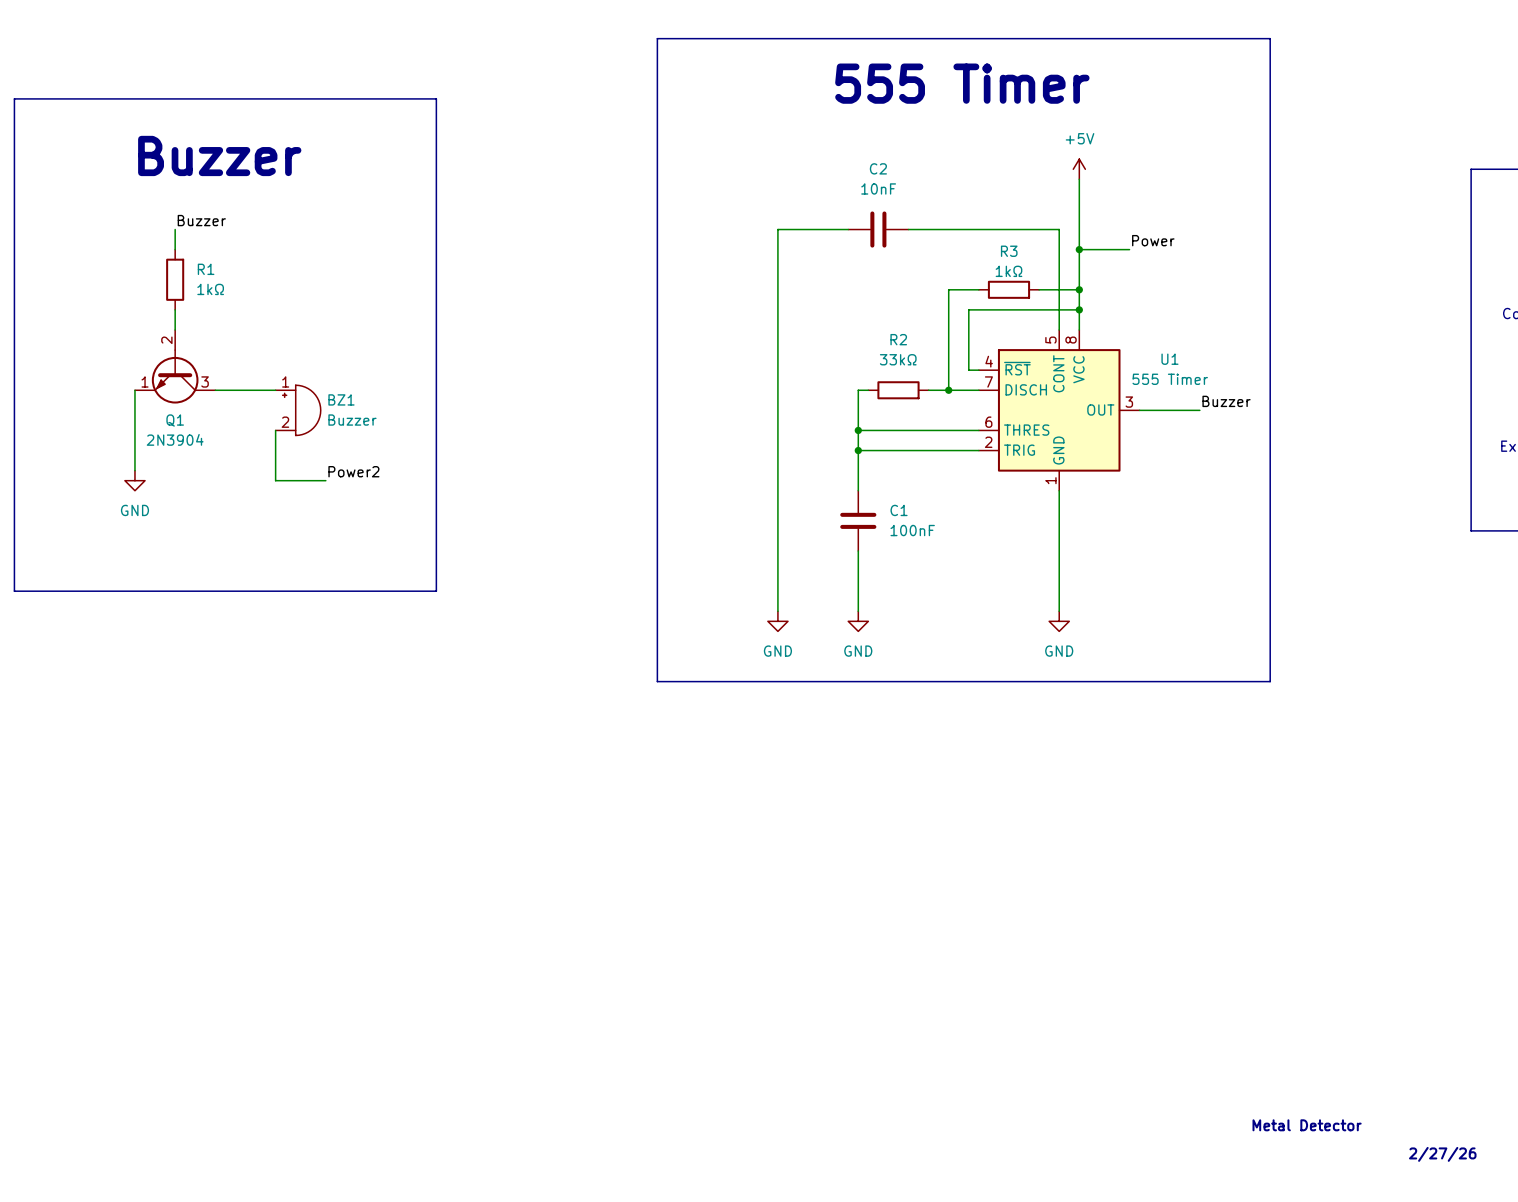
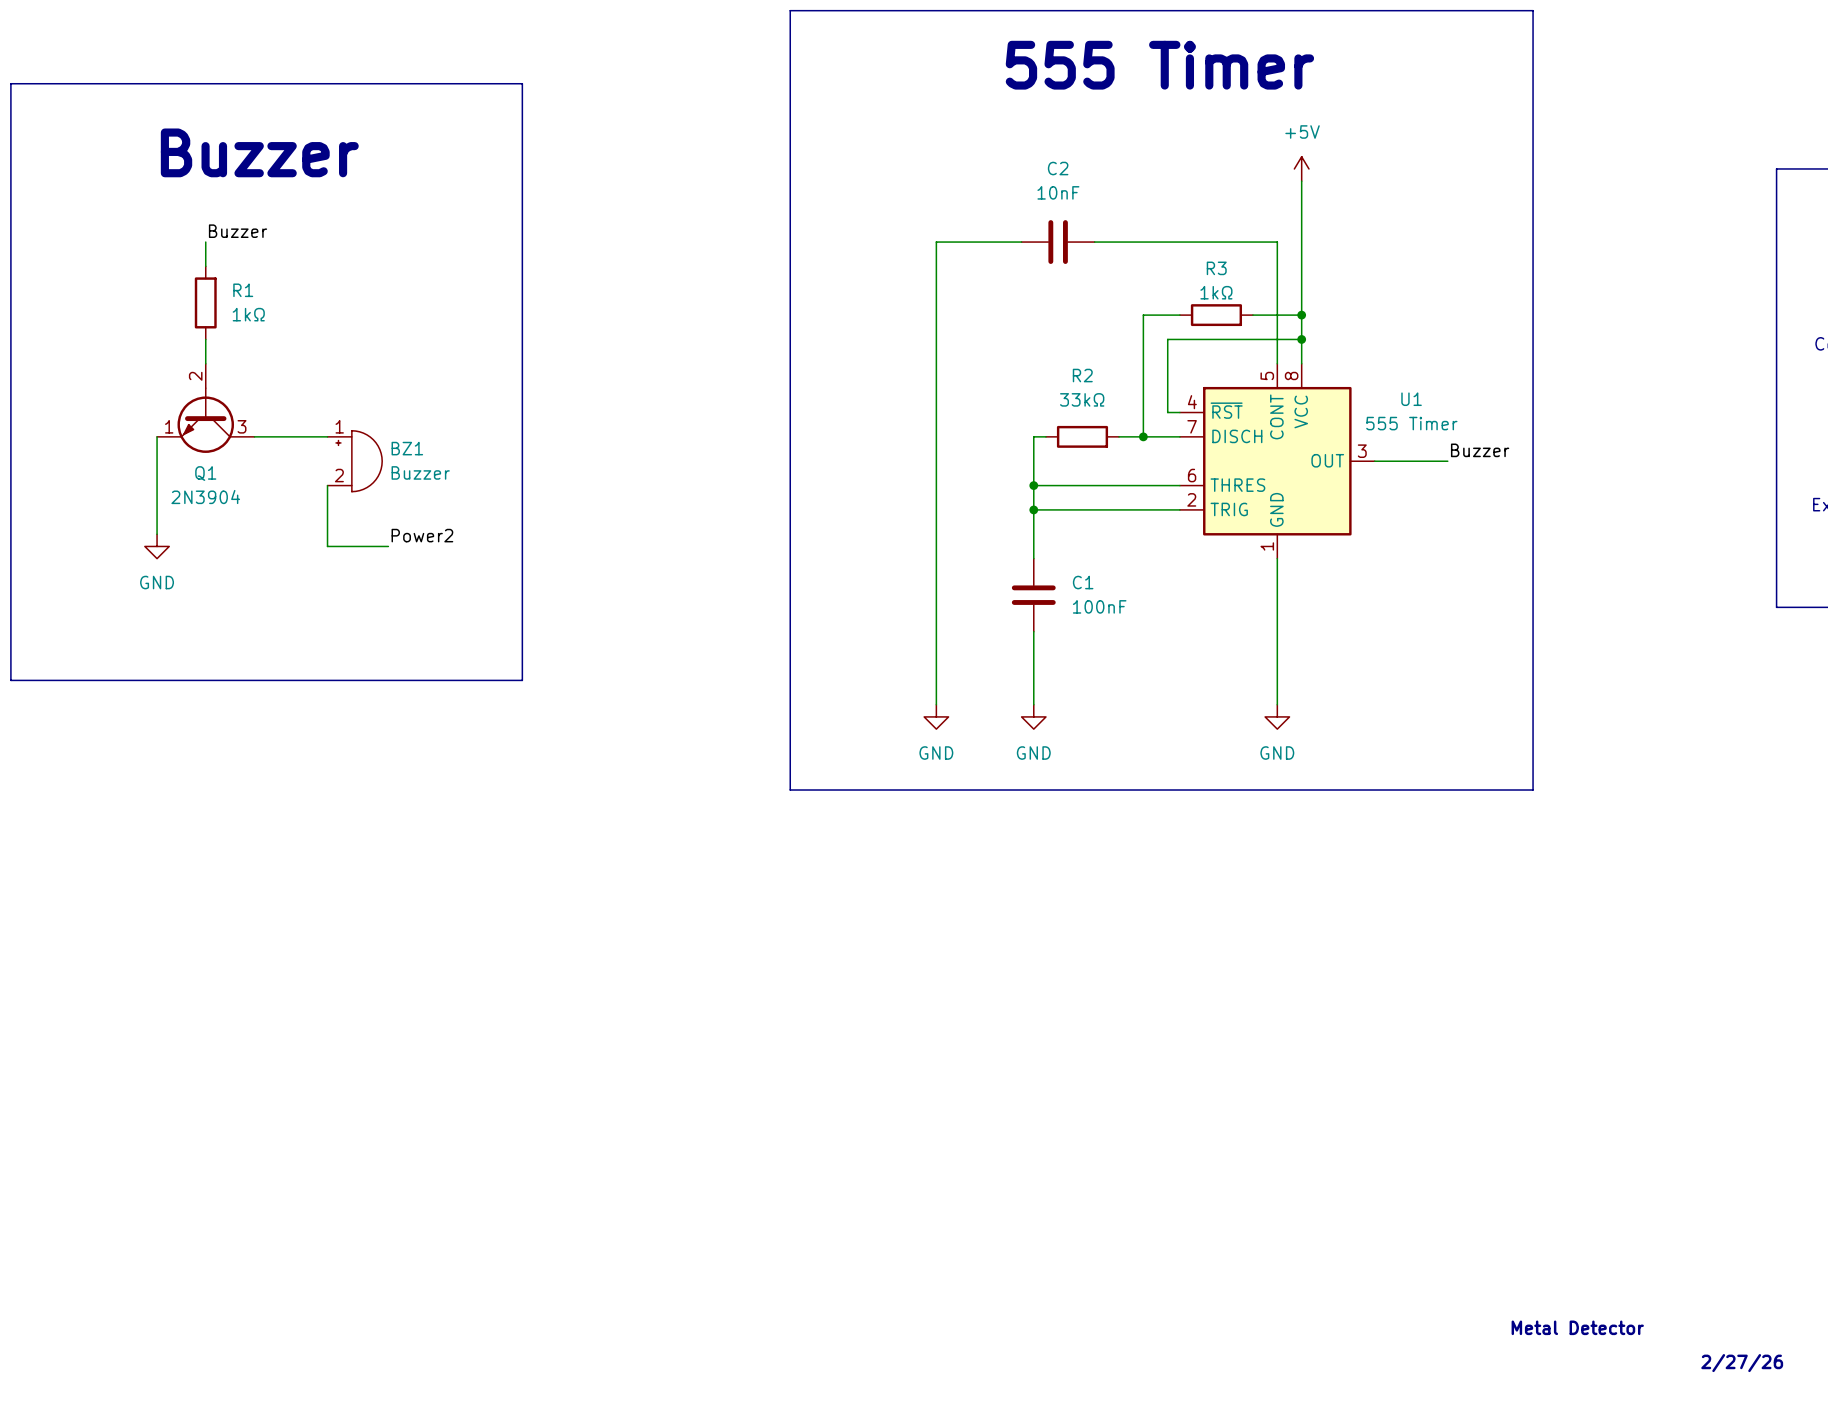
label: Power (1153, 240) -> none
wire: (1079, 249) (1129, 249) -> none
junction: (1079, 249) -> none

